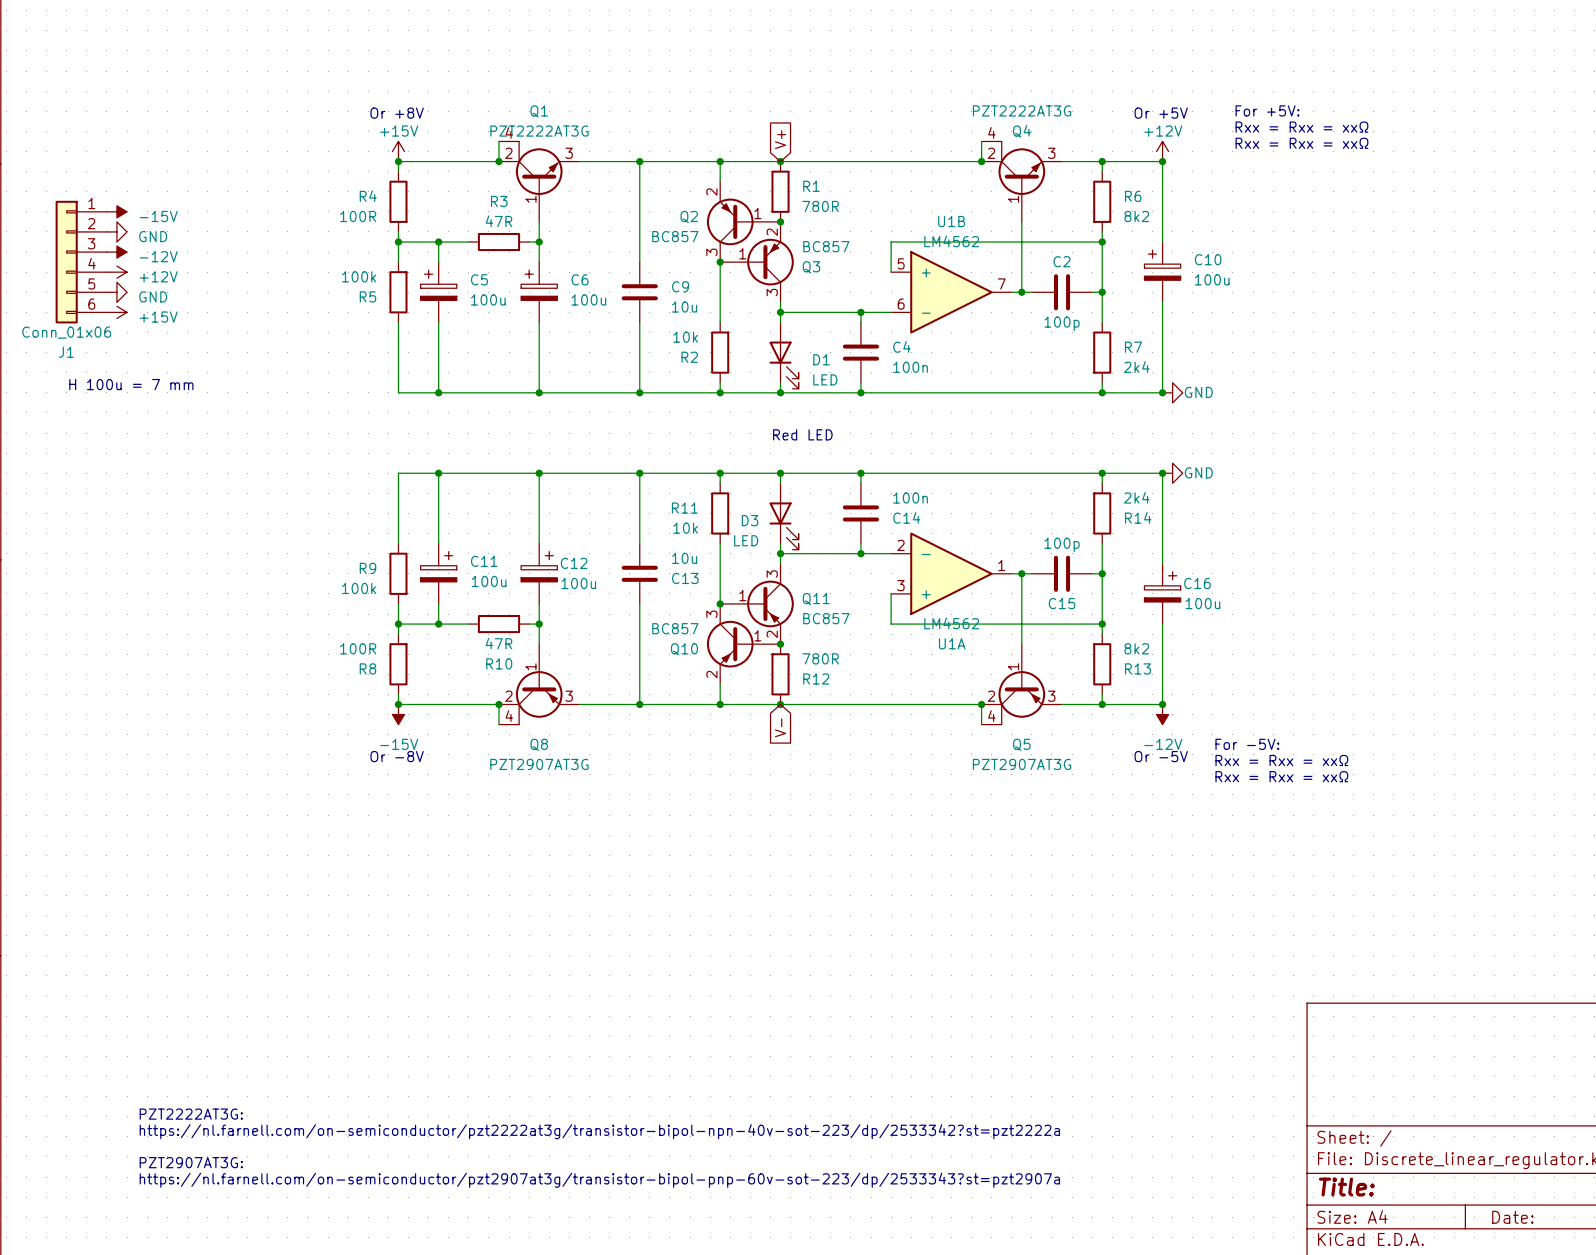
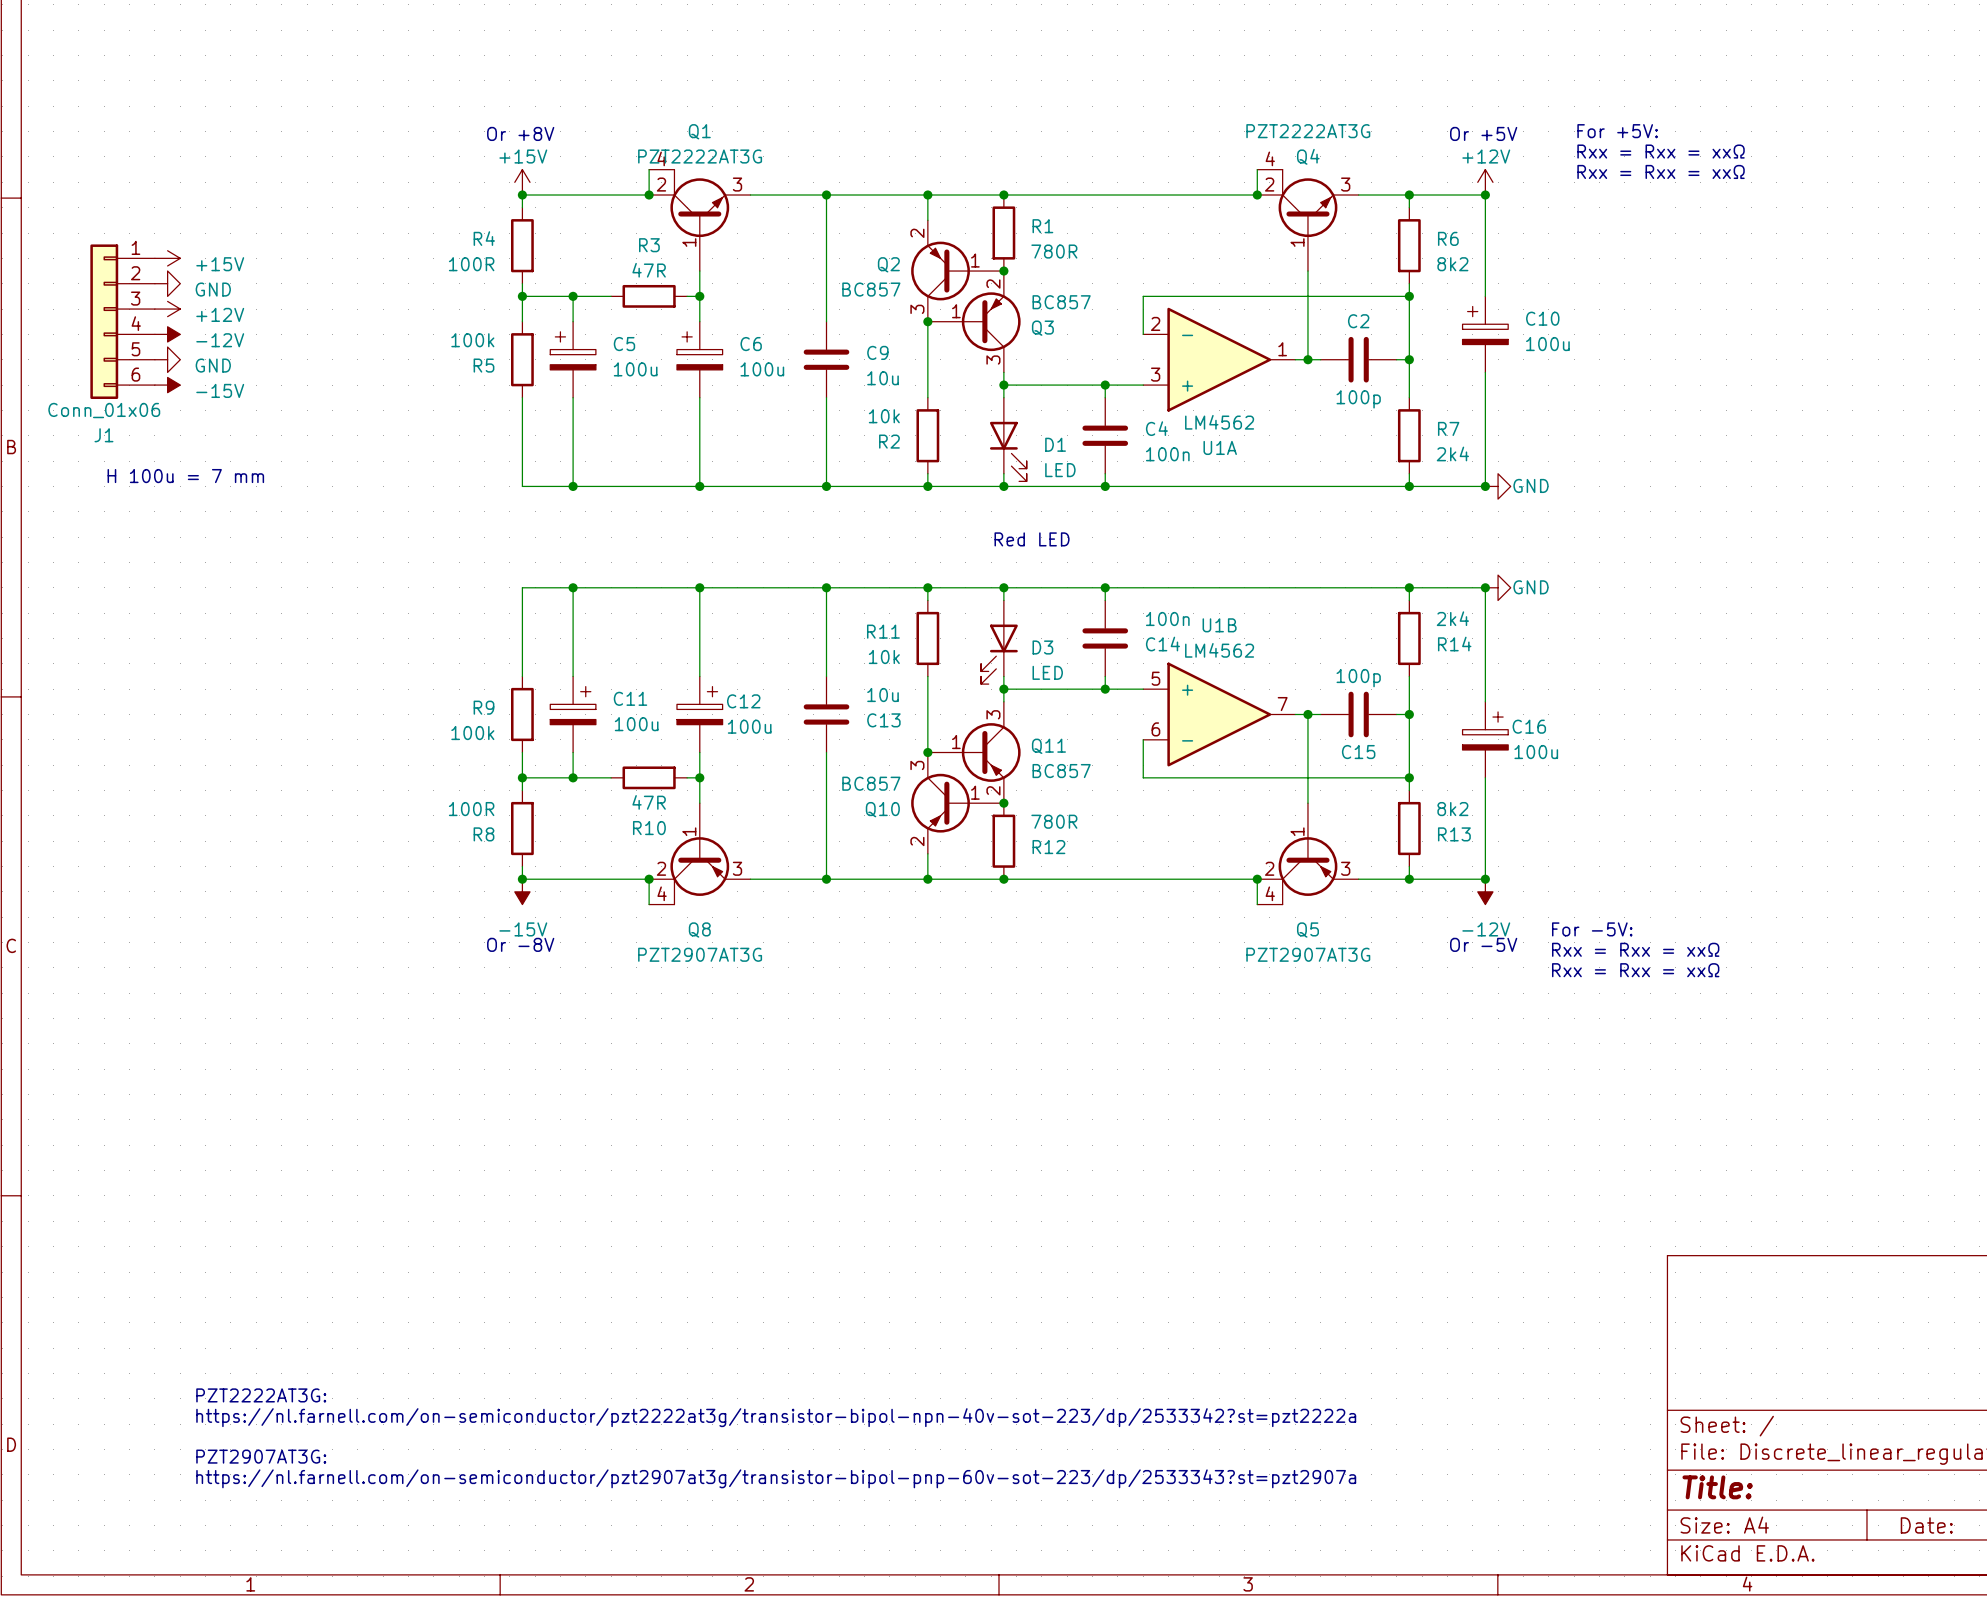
global label: V+ (780, 139) -> none
power symbol: -15V (116, 211) -> +15V (167, 258)
power symbol: -12V (116, 252) -> +12V (167, 309)
power symbol: +12V (116, 272) -> -12V (167, 334)
U1B position: (951, 292) -> (1219, 714)
power symbol: +15V (116, 312) -> -15V (167, 385)
D3 flip: as is (784, 526) -> left-right (999, 654)
U1A position: (951, 573) -> (1219, 359)
global label: V- (780, 727) -> none

